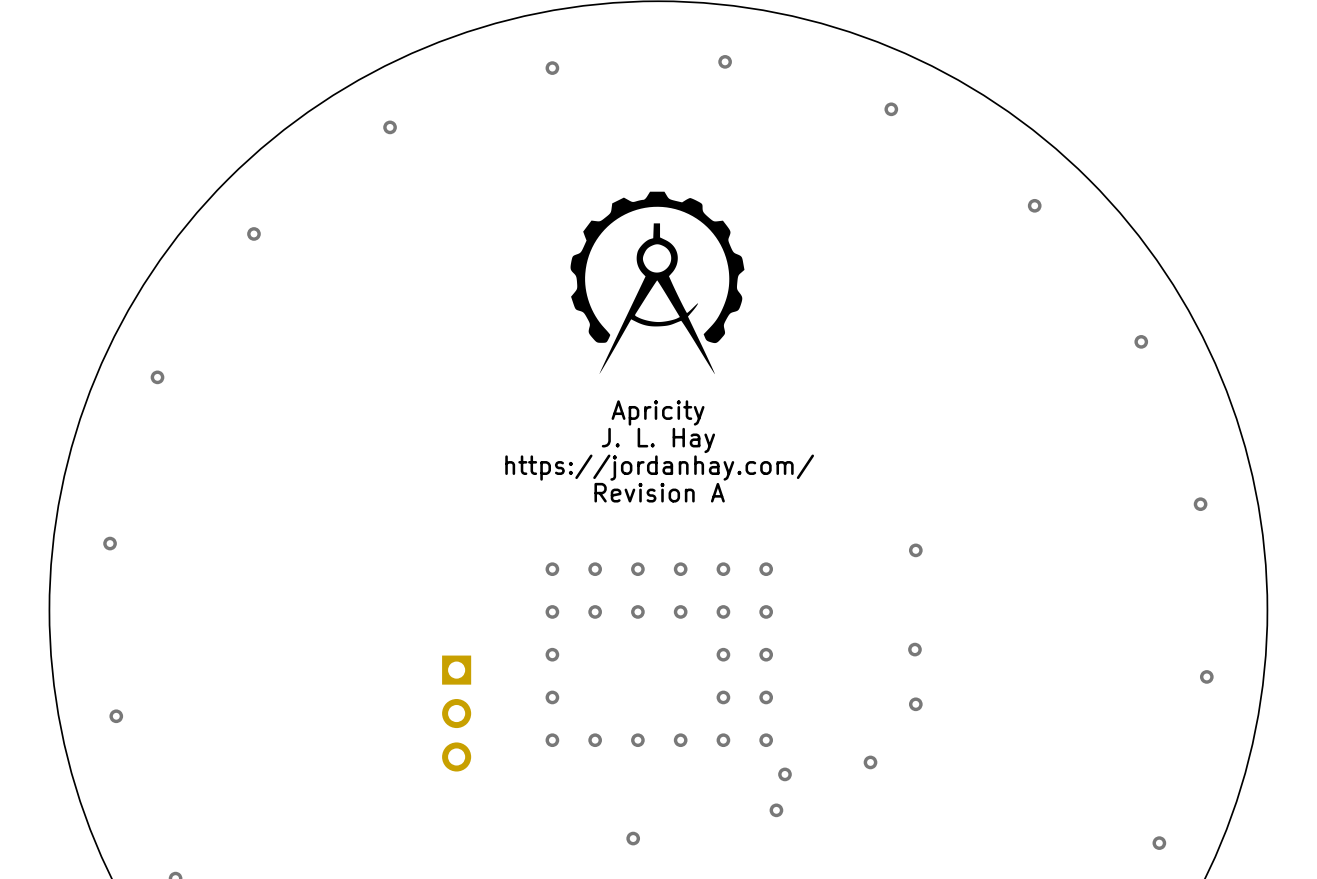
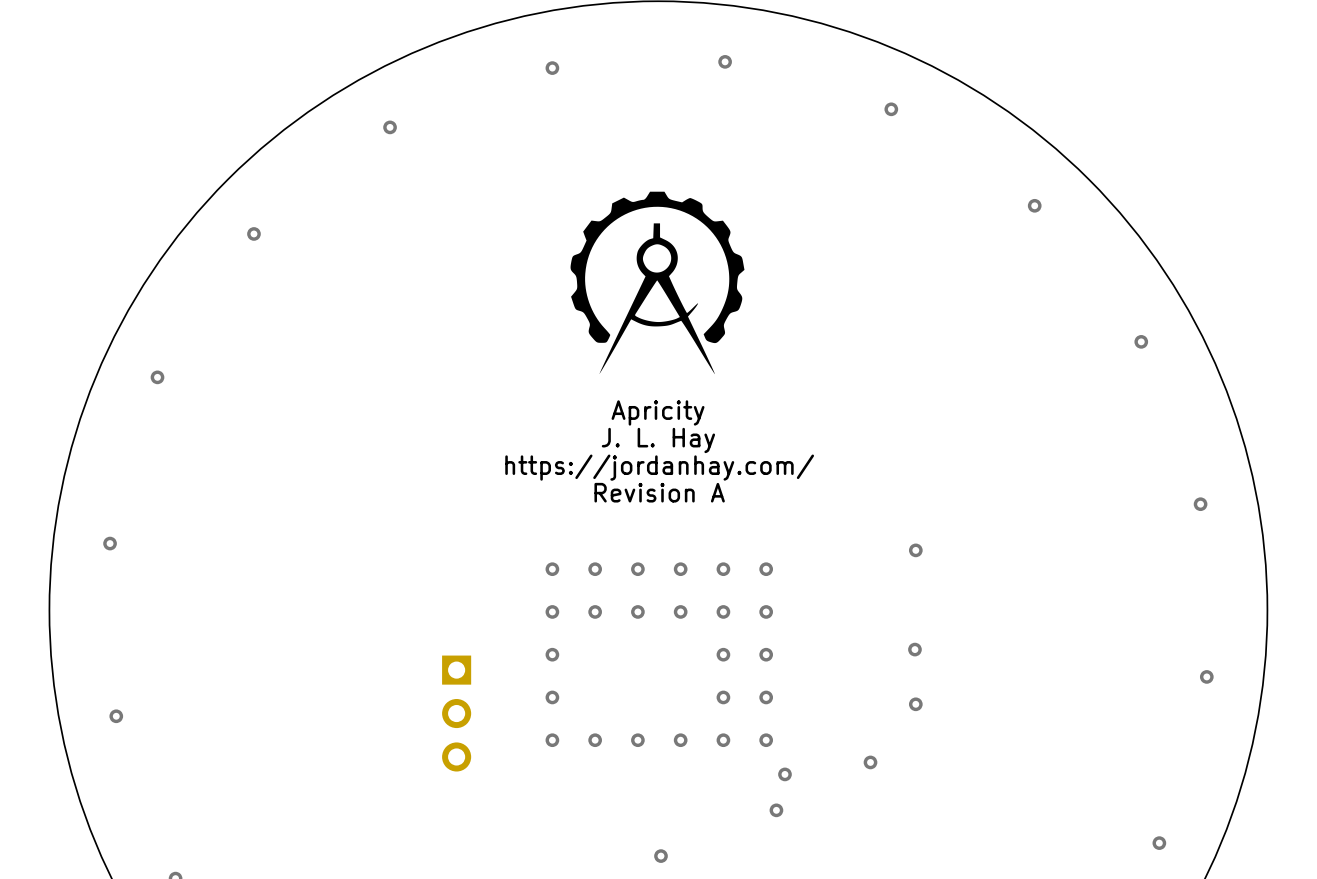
via position: (633, 838) -> (660, 856)

